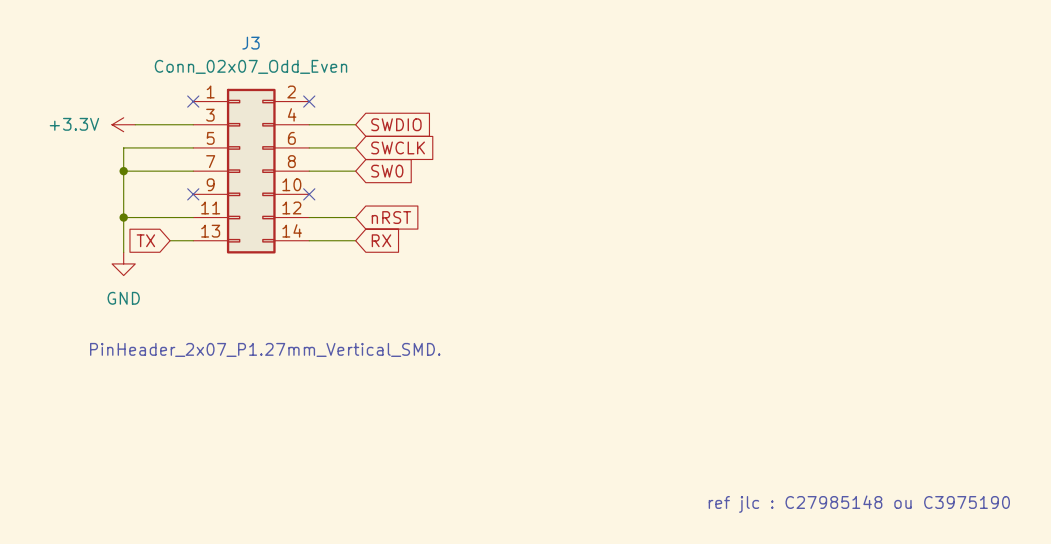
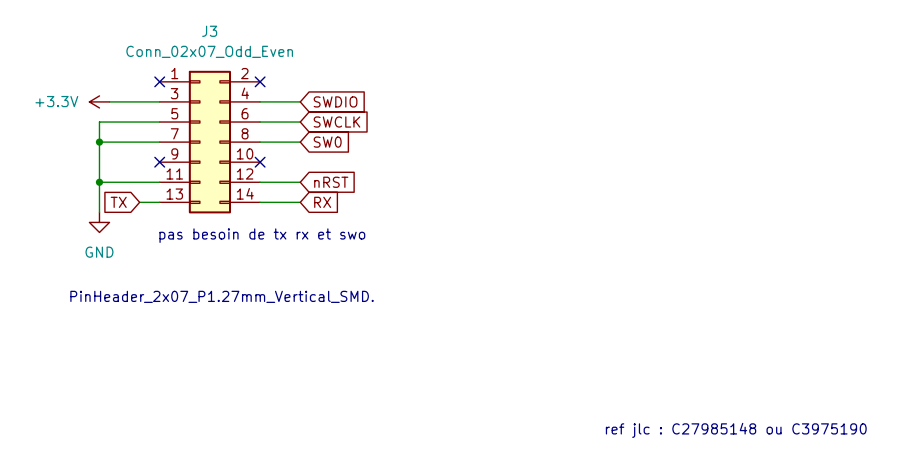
text: none -> pas besoin de tx rx et swo (262, 235)

